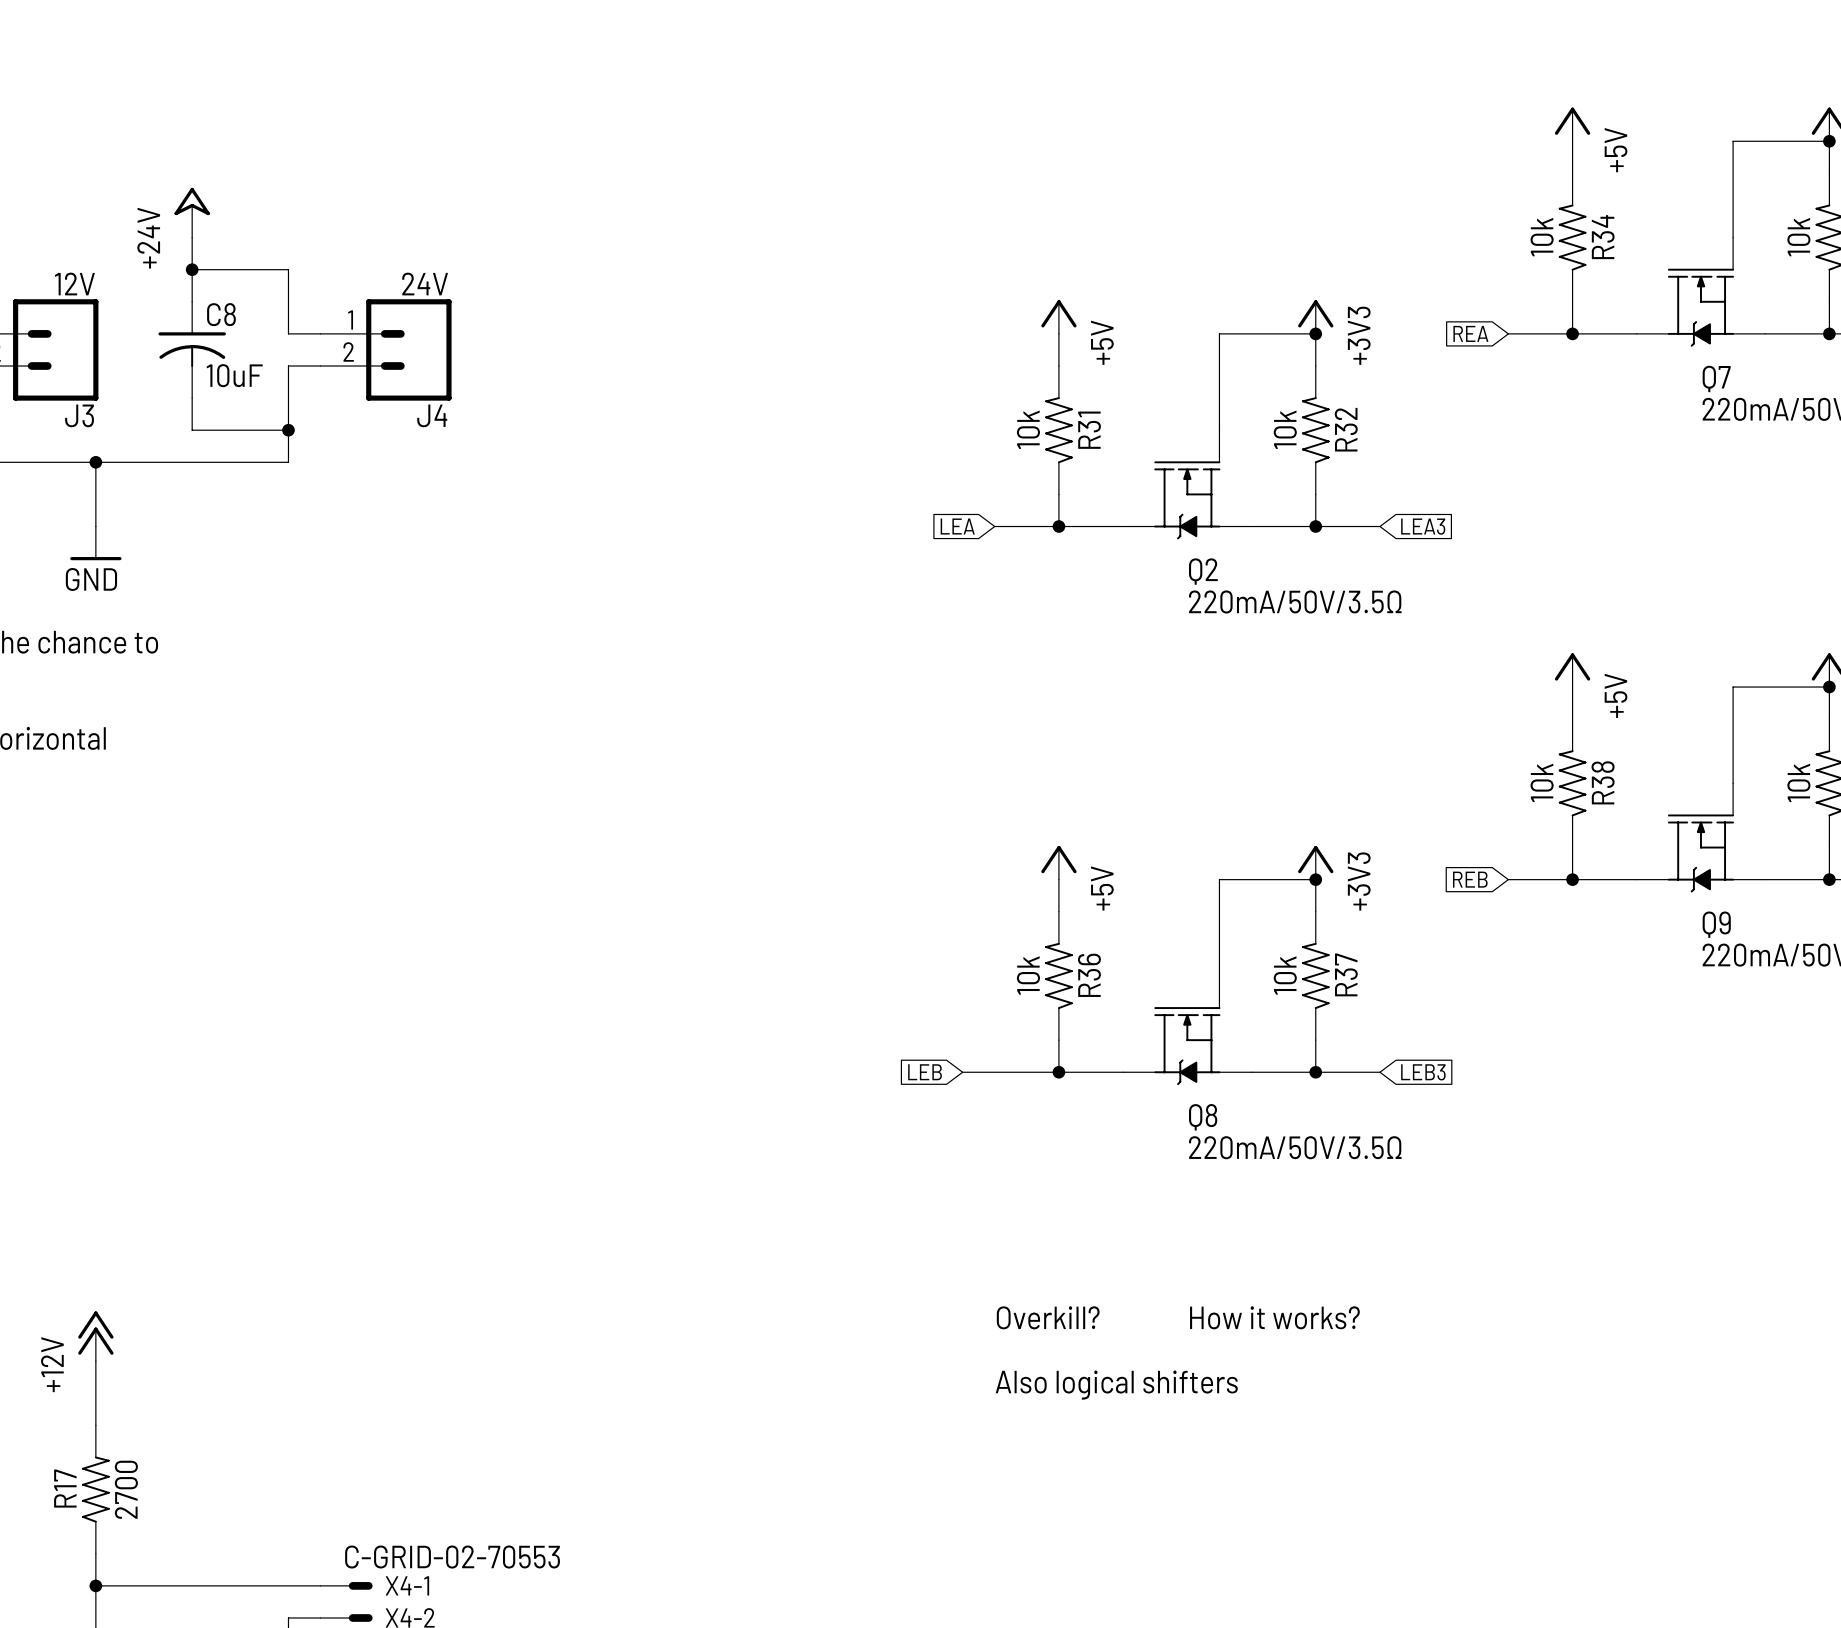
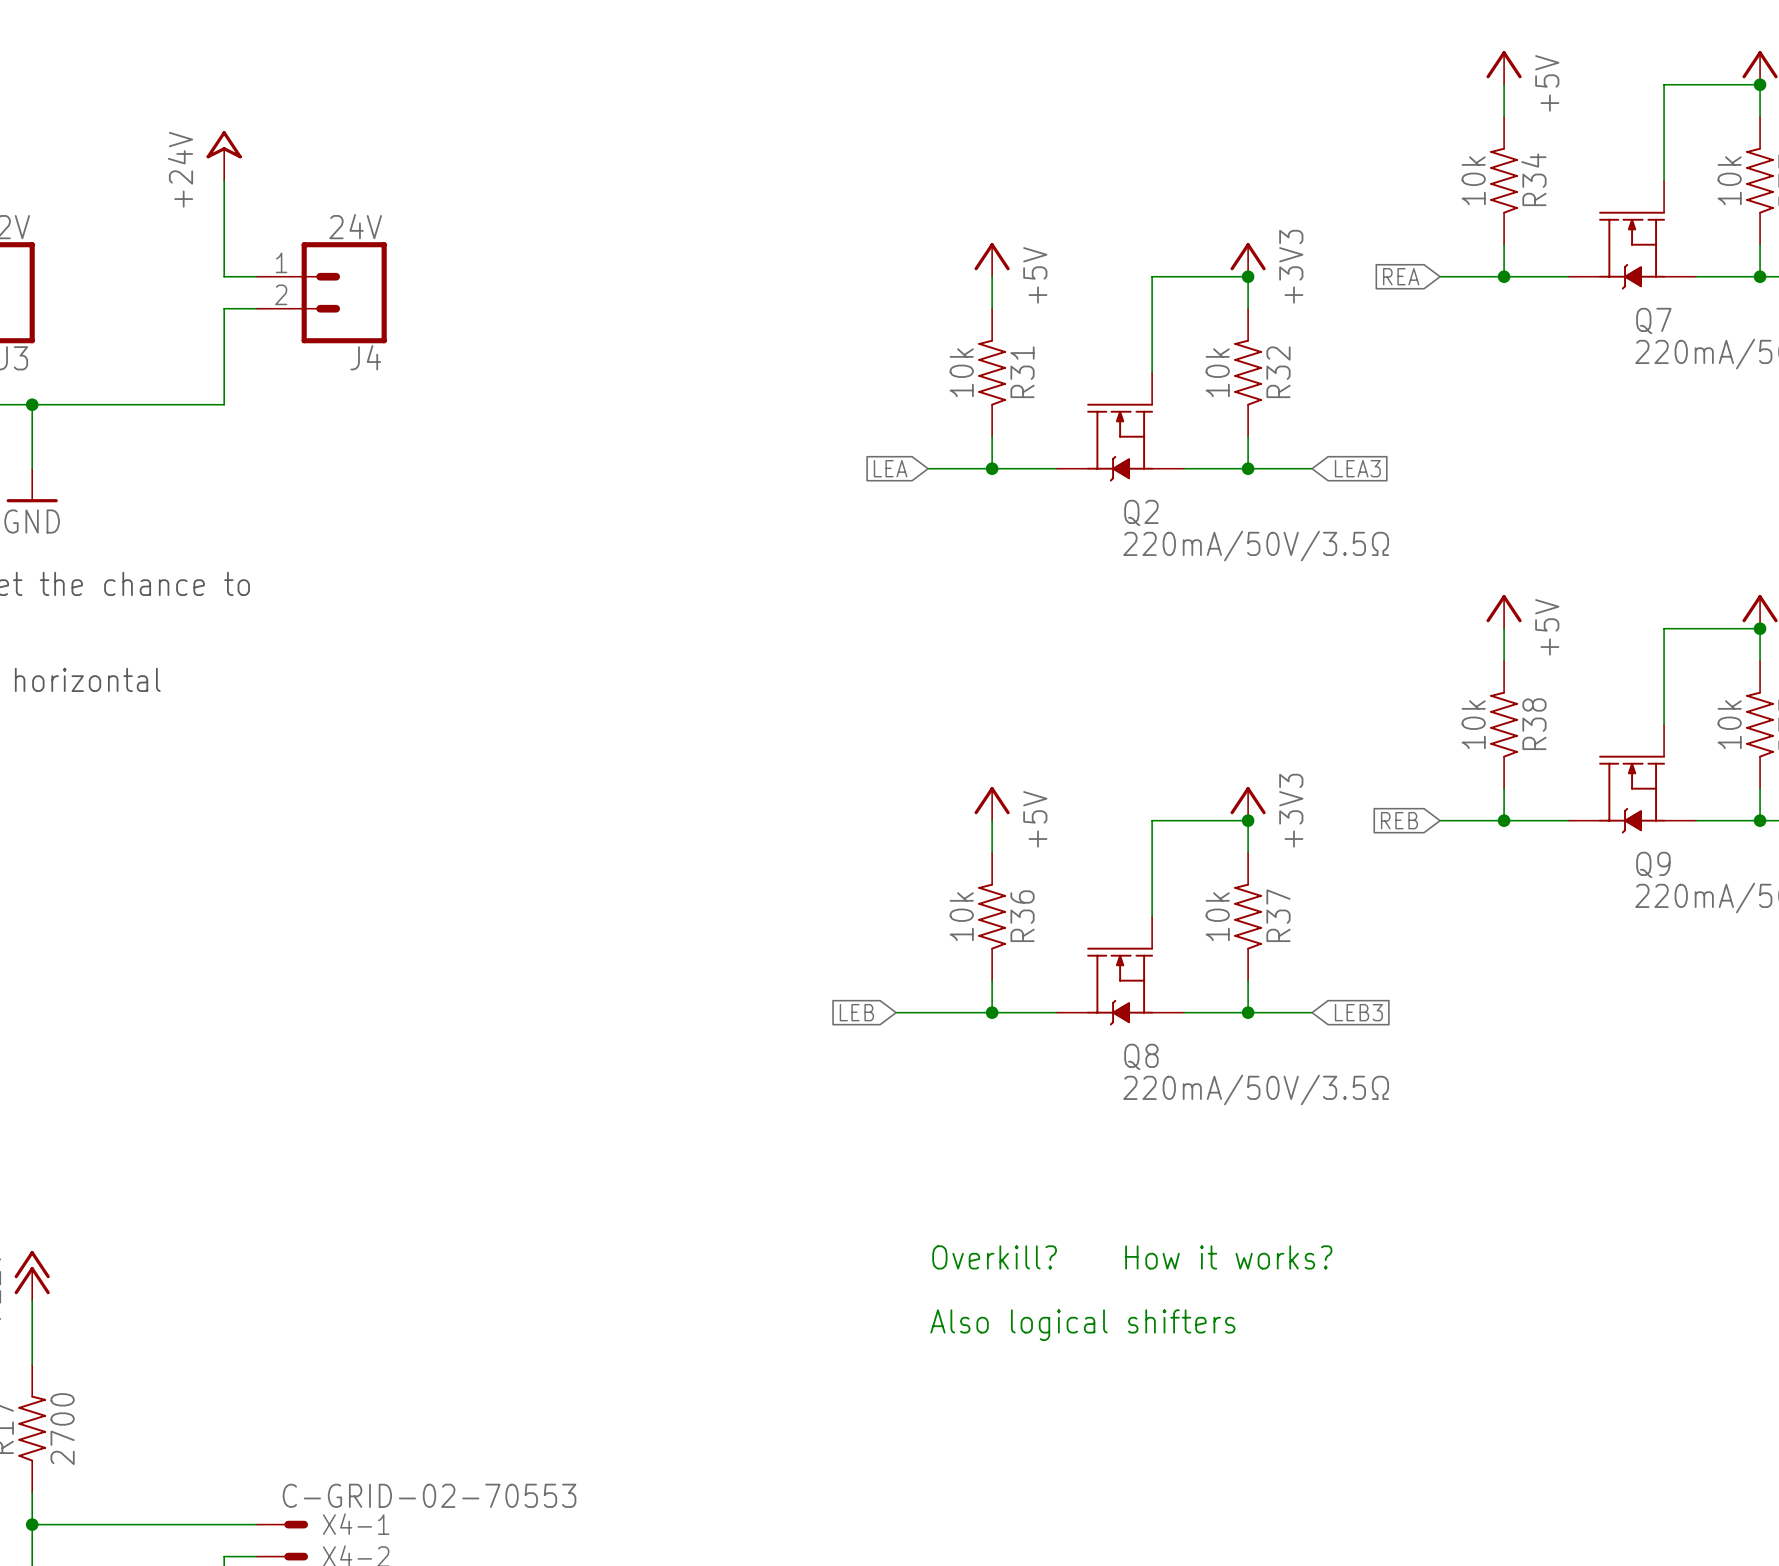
power symbol position: +24V (192, 212) -> +24V (224, 155)
wire: (192, 237) (192, 301) -> none
wire: (192, 269) (288, 269) -> (224, 180) (224, 212)
junction: (192, 269) -> none
C8: 10uF (192, 349) -> none
wire: (192, 398) (192, 430) (288, 430) -> none
junction: (288, 430) -> none

